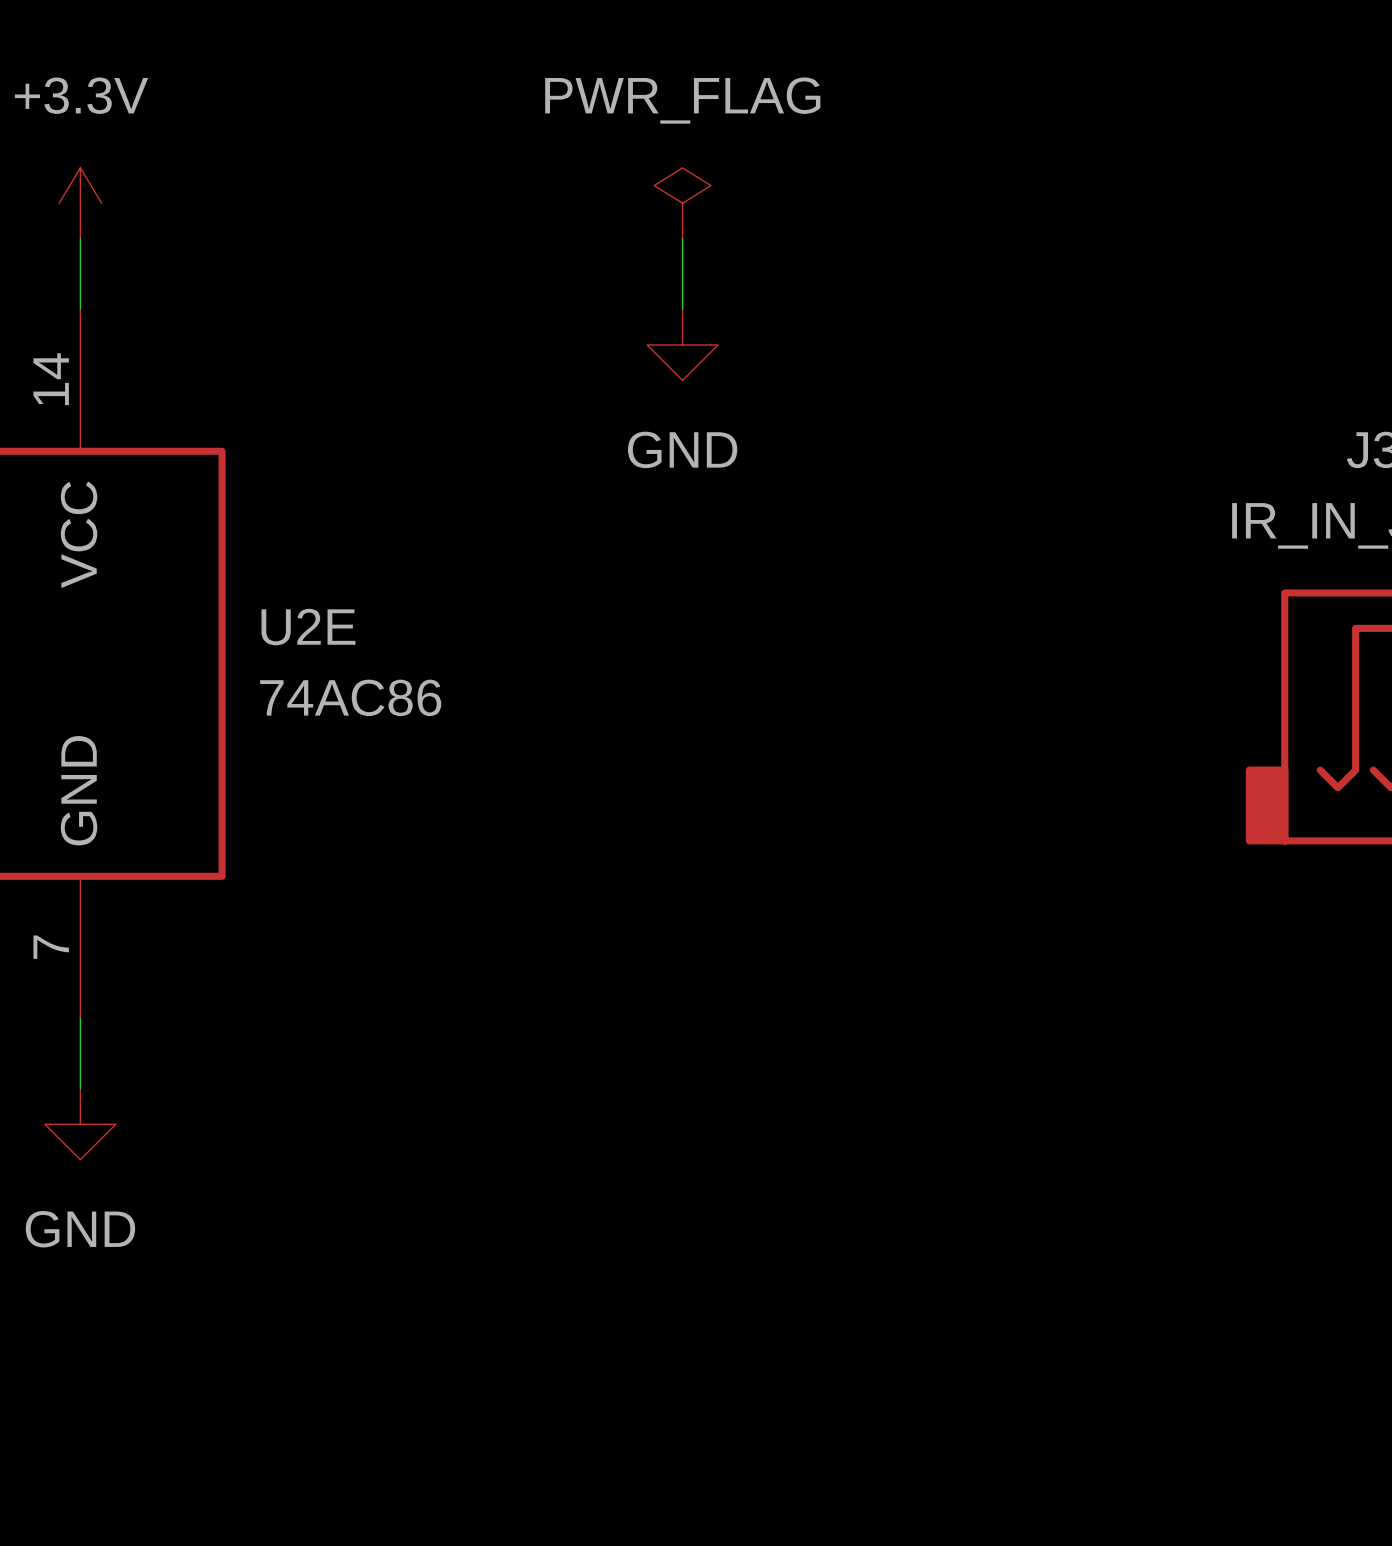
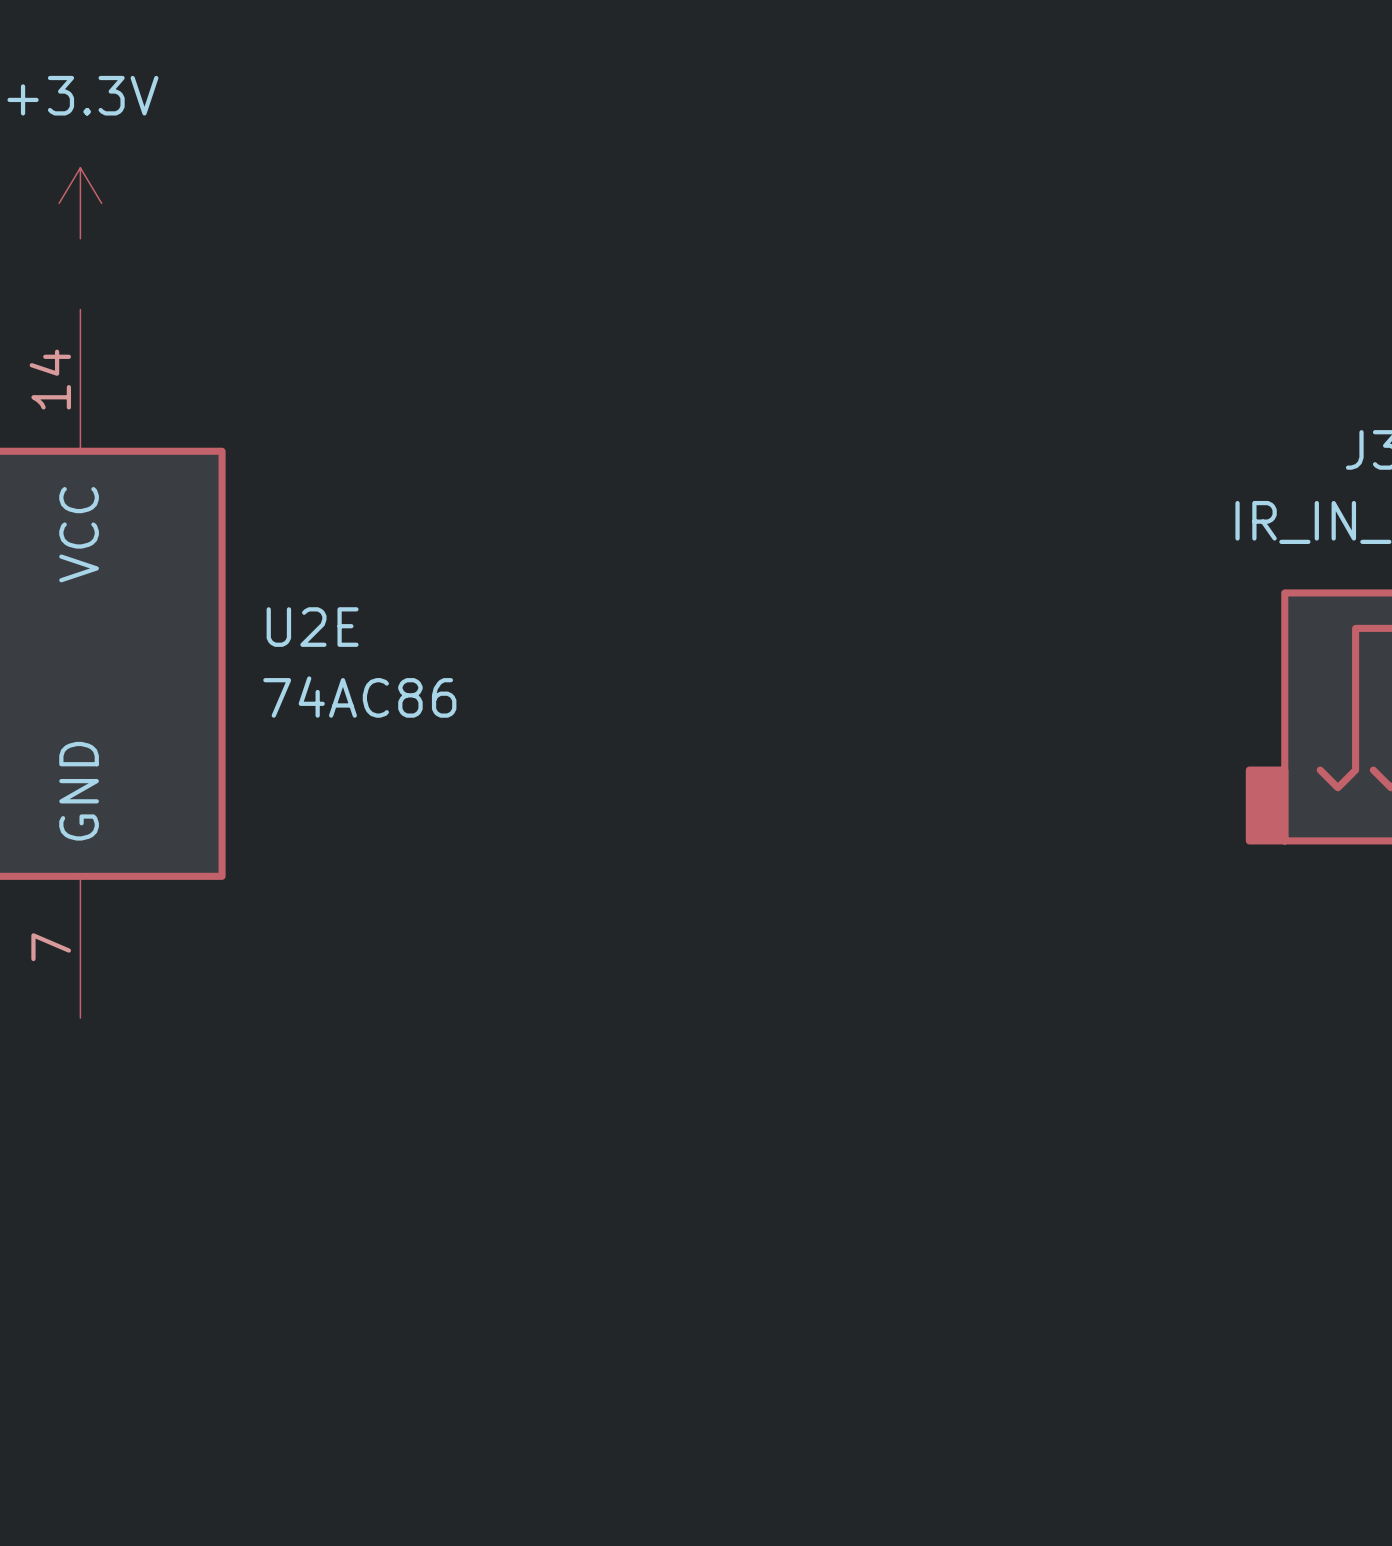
power symbol: PWR_FLAG (682, 203) -> none
wire: (80, 238) (80, 309) -> none
wire: (682, 238) (682, 309) -> none
power symbol: GND (682, 344) -> none
wire: (80, 1018) (80, 1088) -> none
power symbol: GND (80, 1124) -> none

